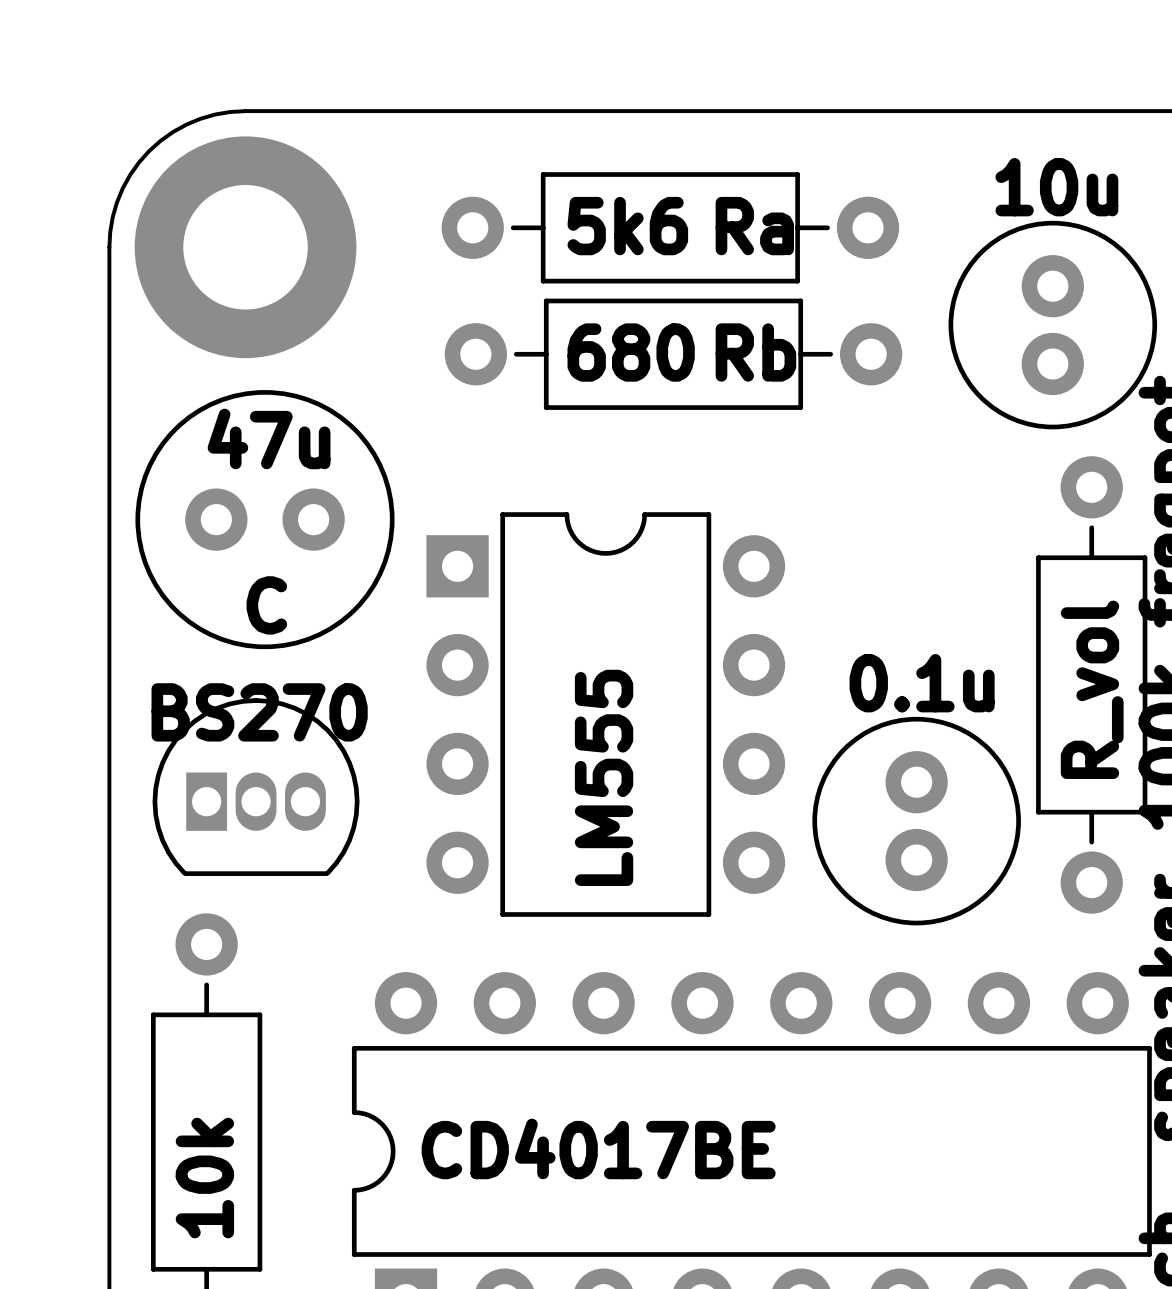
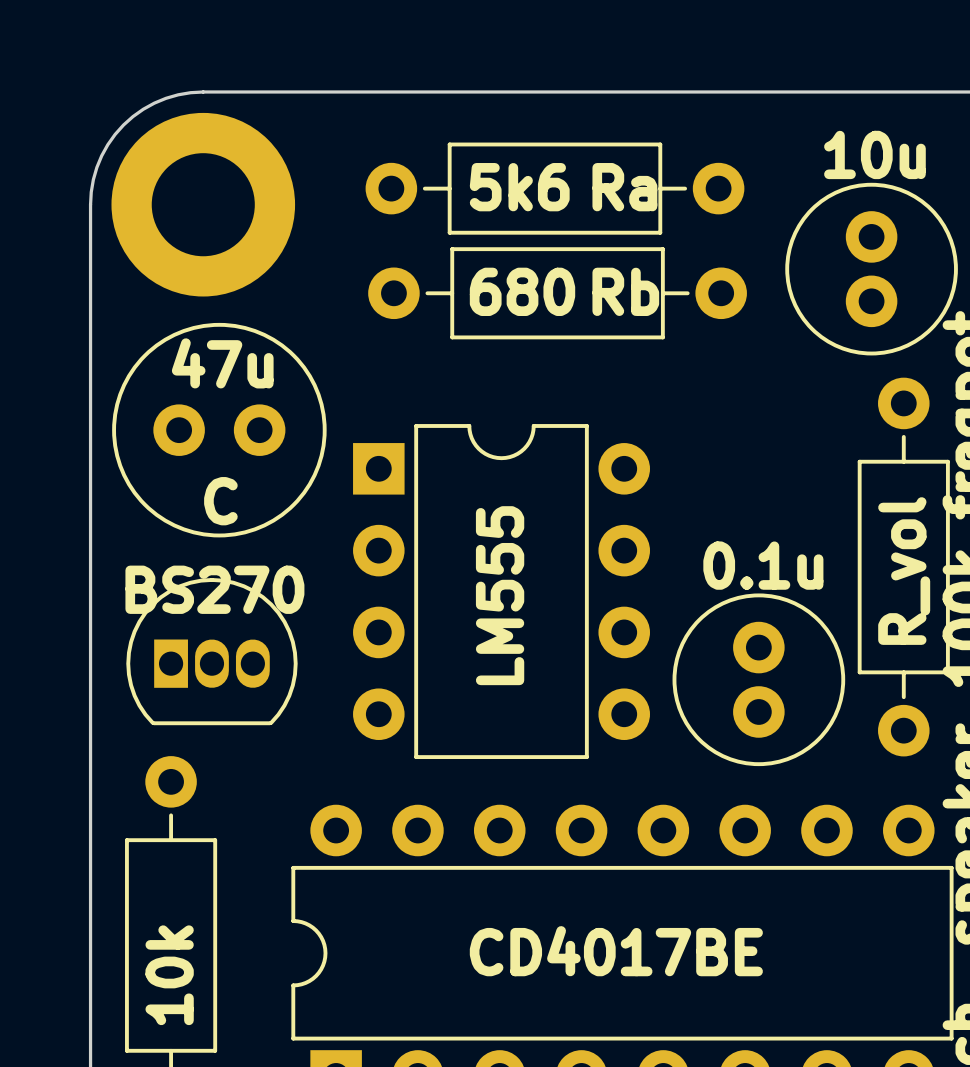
text position: LM555 (604, 777) -> LM555 (500, 595)
text position: CD4017BE (598, 1148) -> CD4017BE (616, 951)

